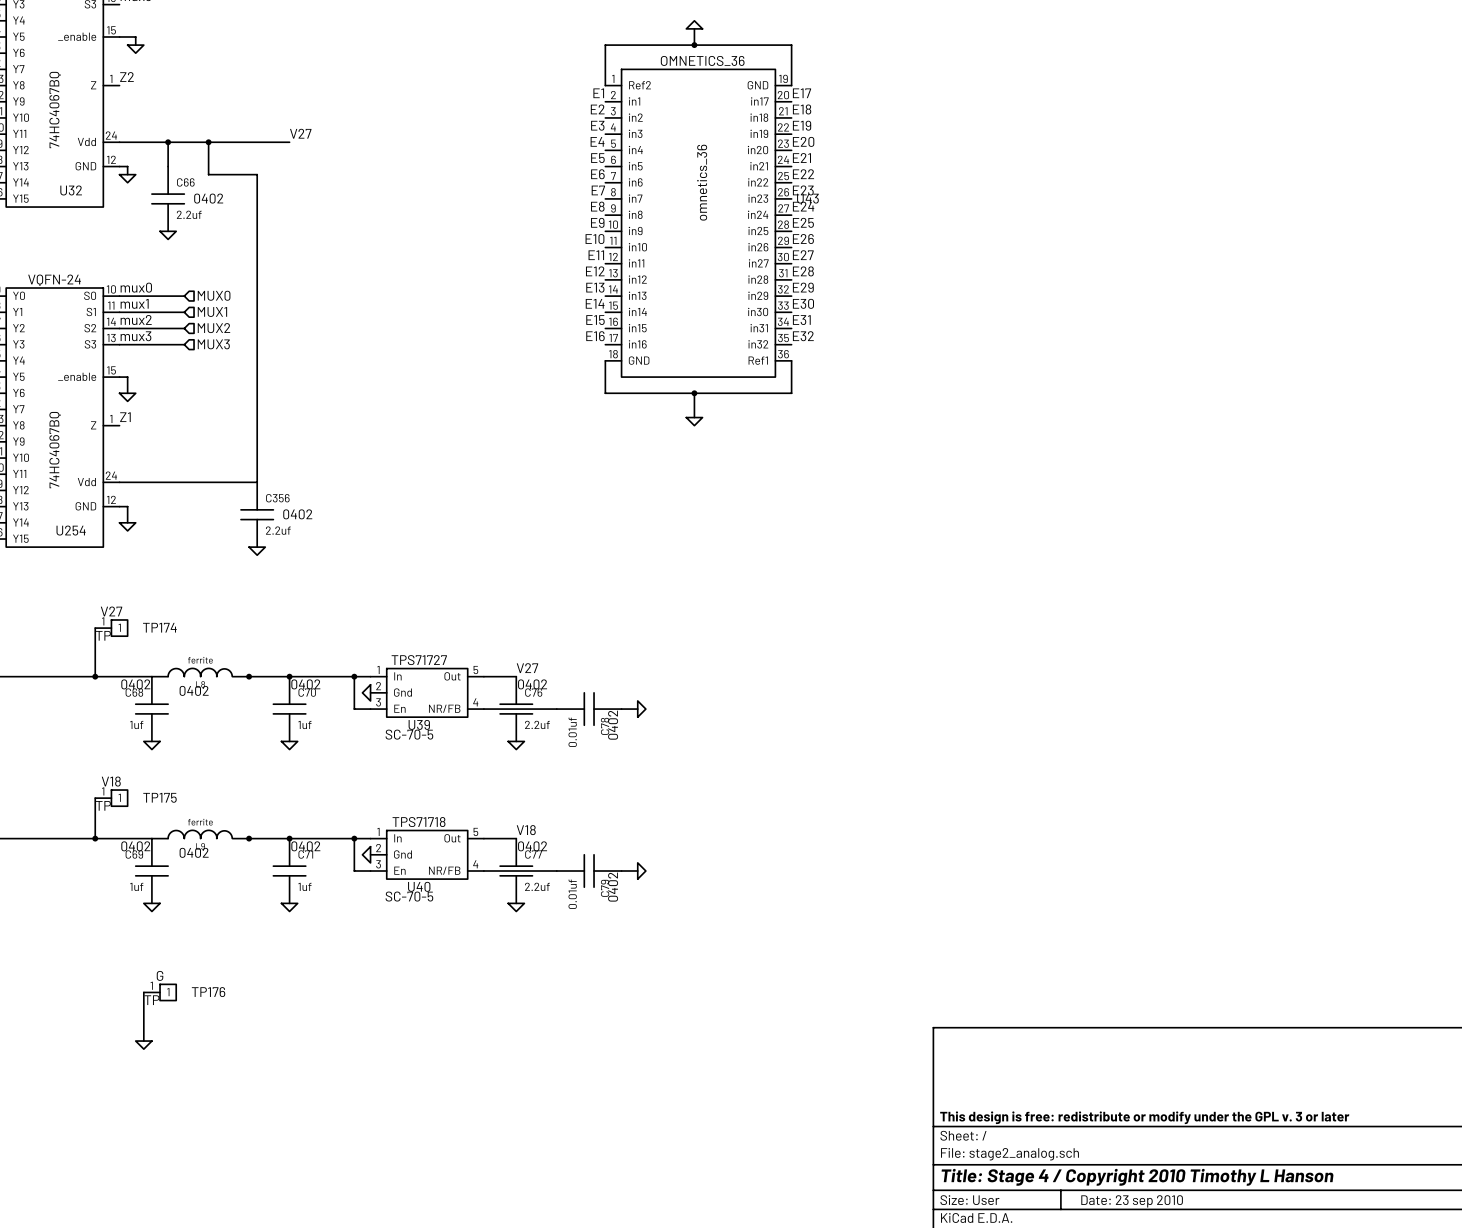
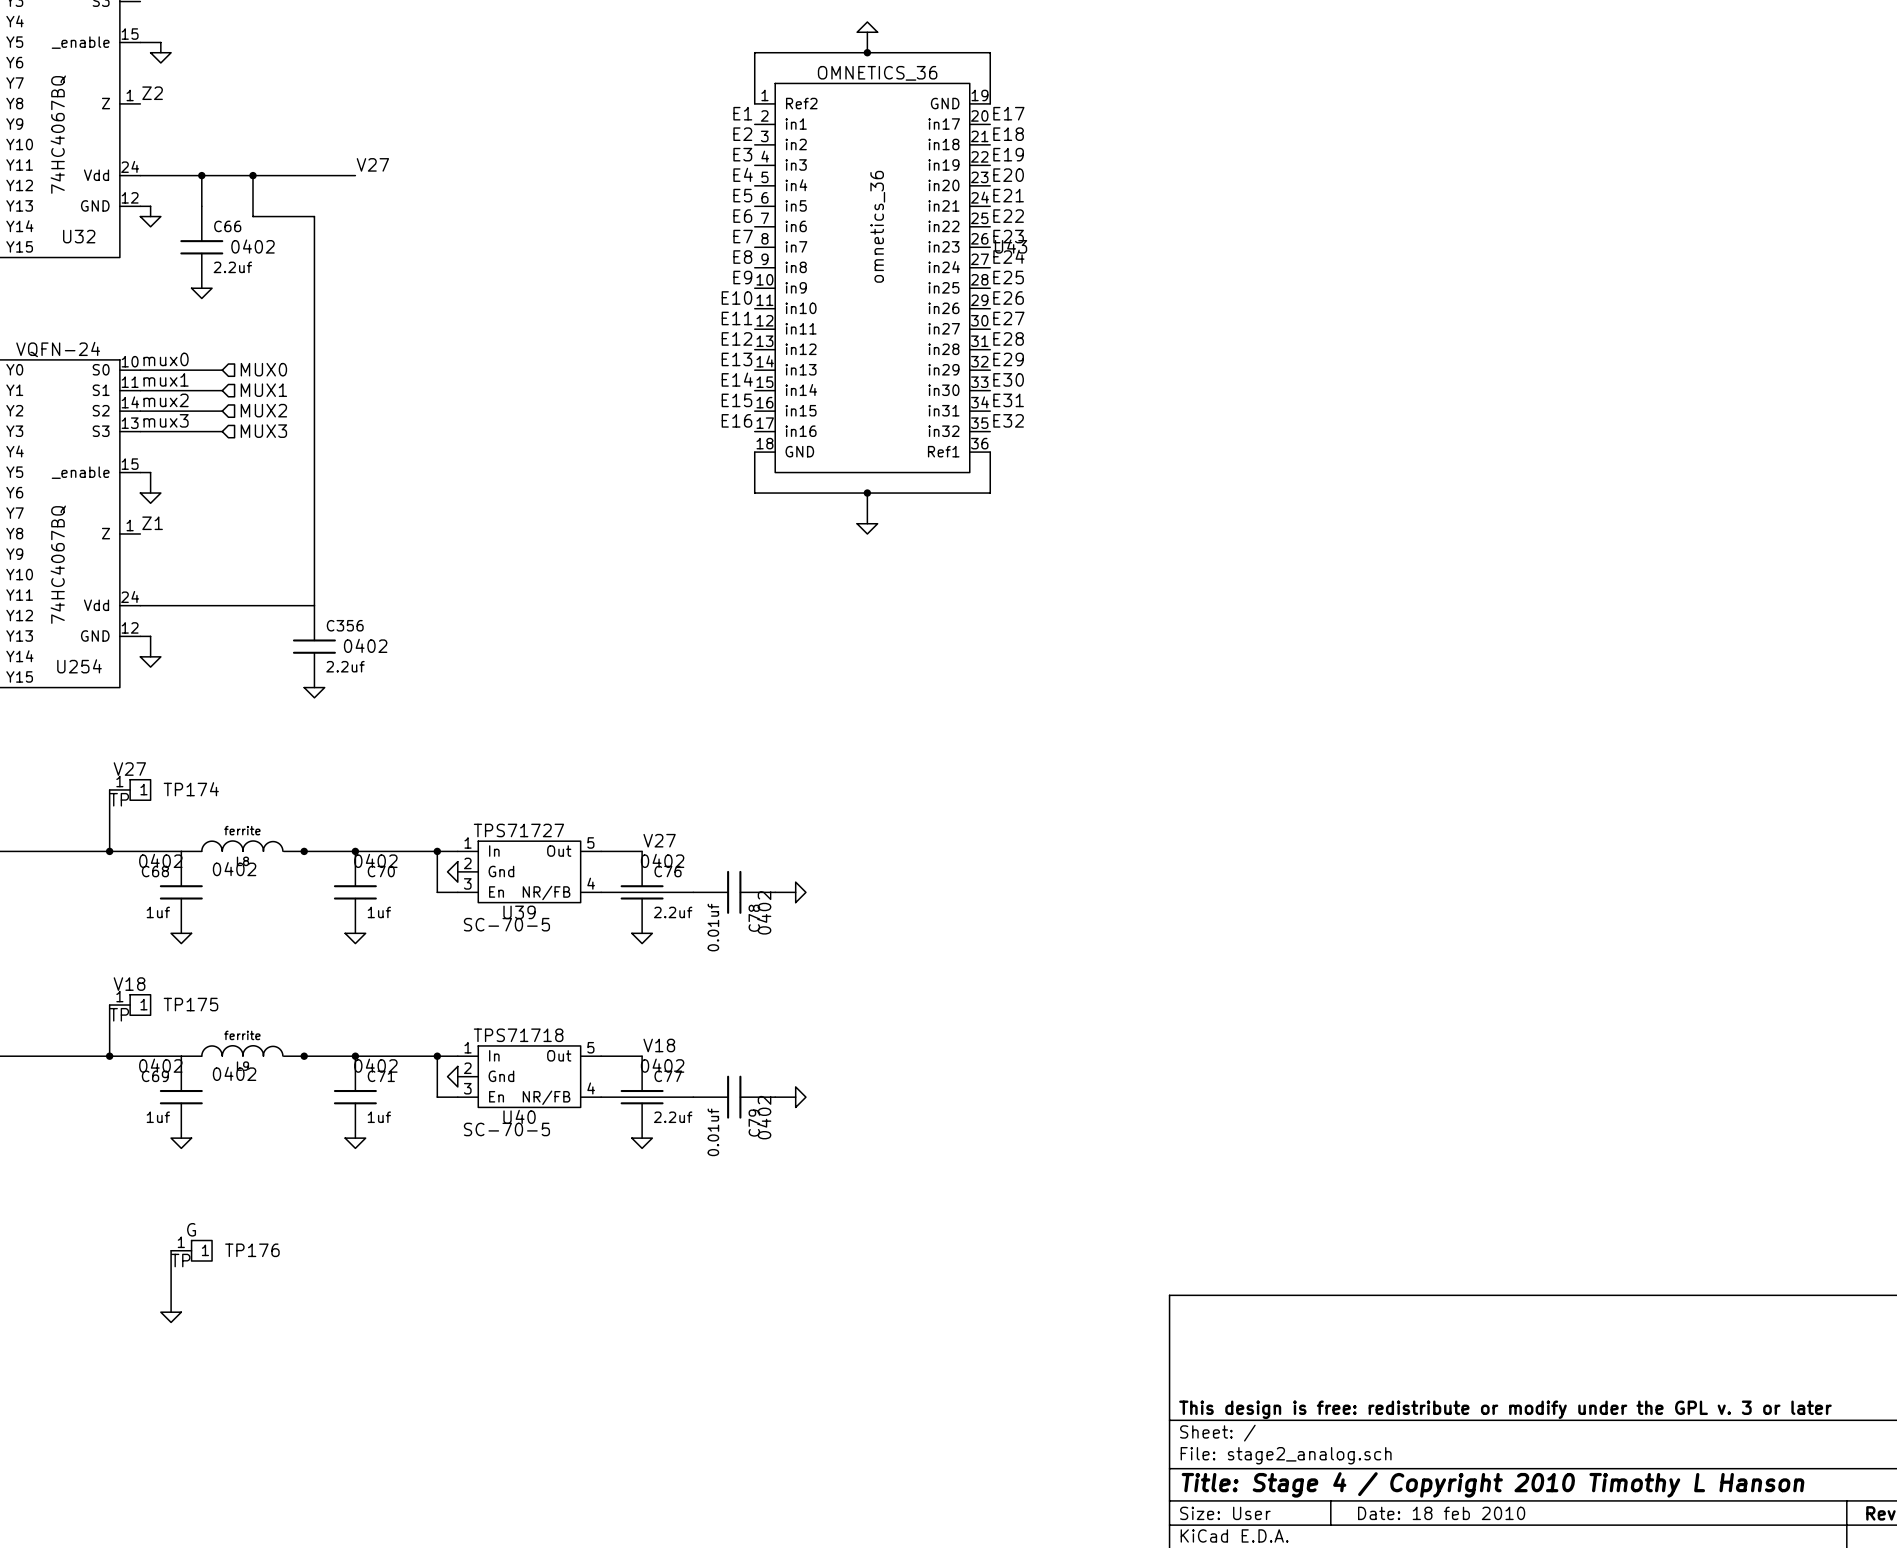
title block: Date: 23 sep 2010 (1132, 1201) -> Date: 18 feb 2010 (1441, 1513)

